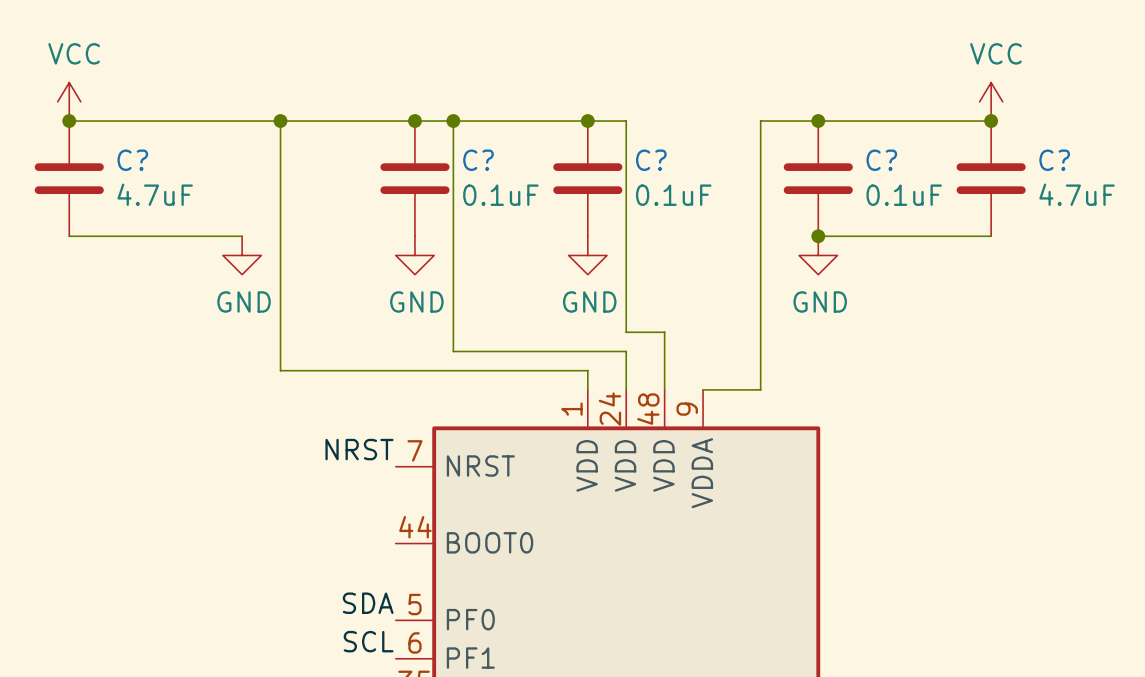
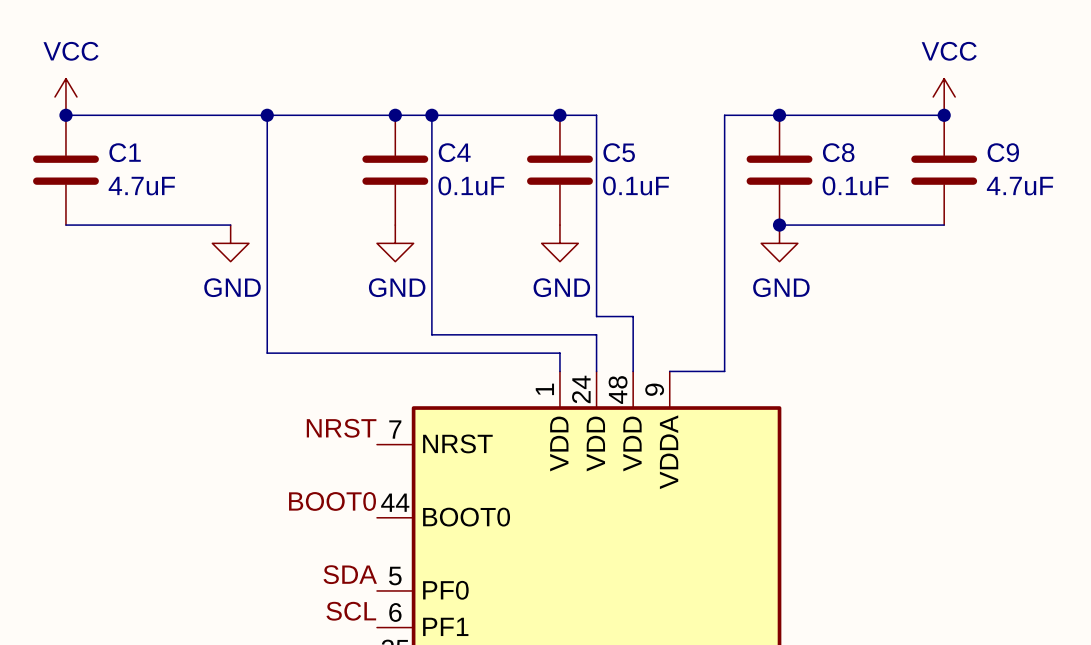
C? name: C? (132, 160) -> C1 (125, 152)
C? name: C? (478, 160) -> C4 (454, 152)
C? name: C? (651, 160) -> C5 (619, 152)
C? name: C? (881, 160) -> C8 (838, 152)
C? name: C? (1054, 160) -> C9 (1003, 152)
label: none -> BOOT0 (332, 501)

